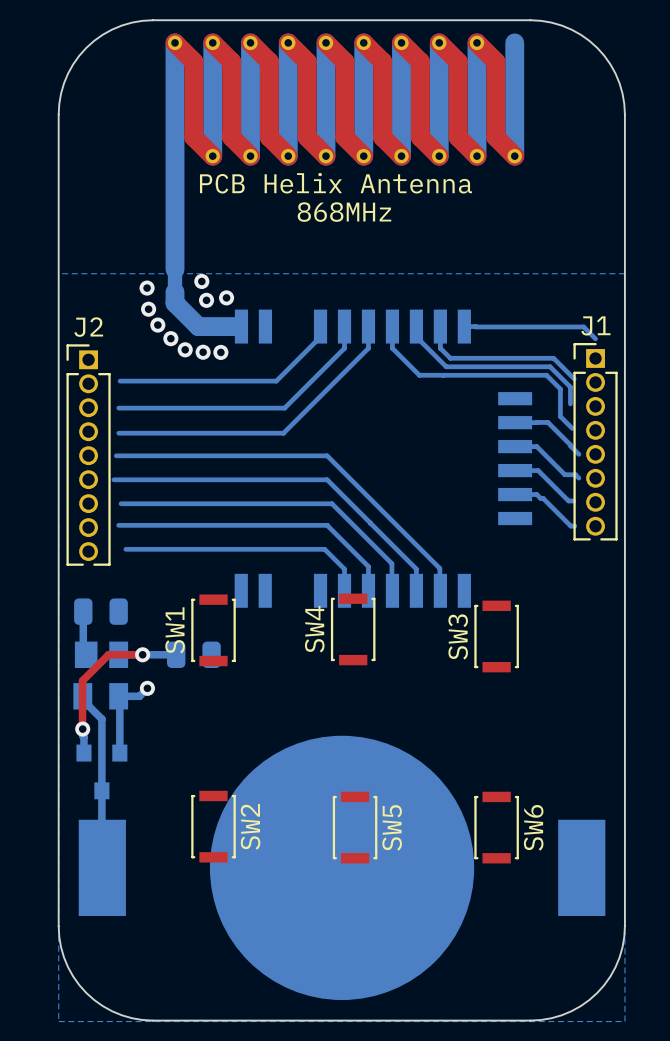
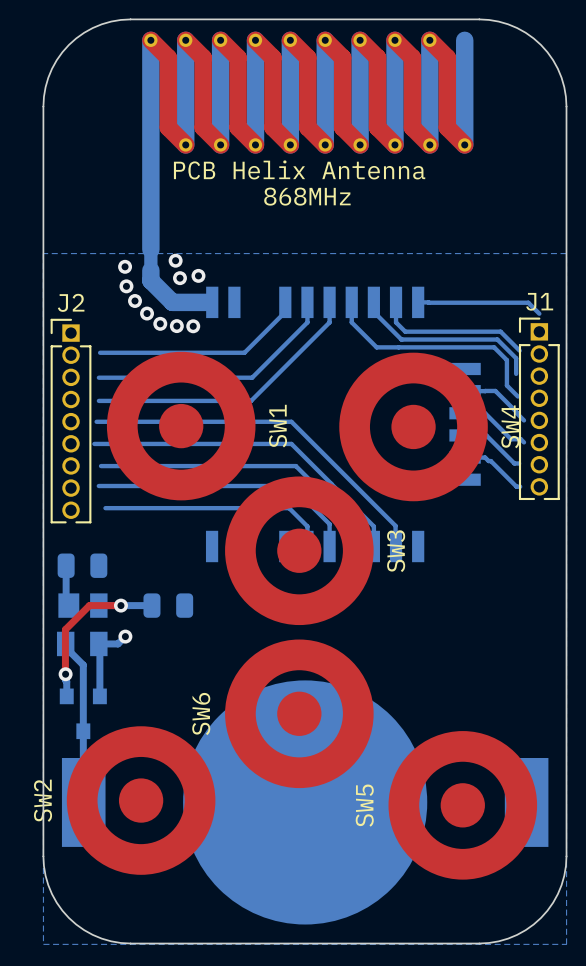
SW4 footprint: [330, 593, 376, 666] -> [339, 352, 488, 502]
SW1 footprint: [191, 594, 236, 667] -> [106, 351, 256, 501]
SW3 footprint: [474, 600, 519, 673] -> [225, 476, 374, 626]
SW4 name position: SW4 (314, 629) -> SW4 (510, 426)
SW1 name position: SW1 (175, 630) -> SW1 (277, 426)
SW3 name position: SW3 (458, 636) -> SW3 (396, 551)
SW2 footprint: [191, 790, 236, 863] -> [66, 726, 216, 875]
SW5 footprint: [332, 791, 378, 864] -> [388, 731, 538, 880]
SW6 footprint: [474, 791, 519, 864] -> [225, 639, 374, 789]
SW2 name position: SW2 (250, 826) -> SW2 (43, 800)
SW5 name position: SW5 (392, 827) -> SW5 (364, 805)
SW6 name position: SW6 (533, 827) -> SW6 (201, 714)

